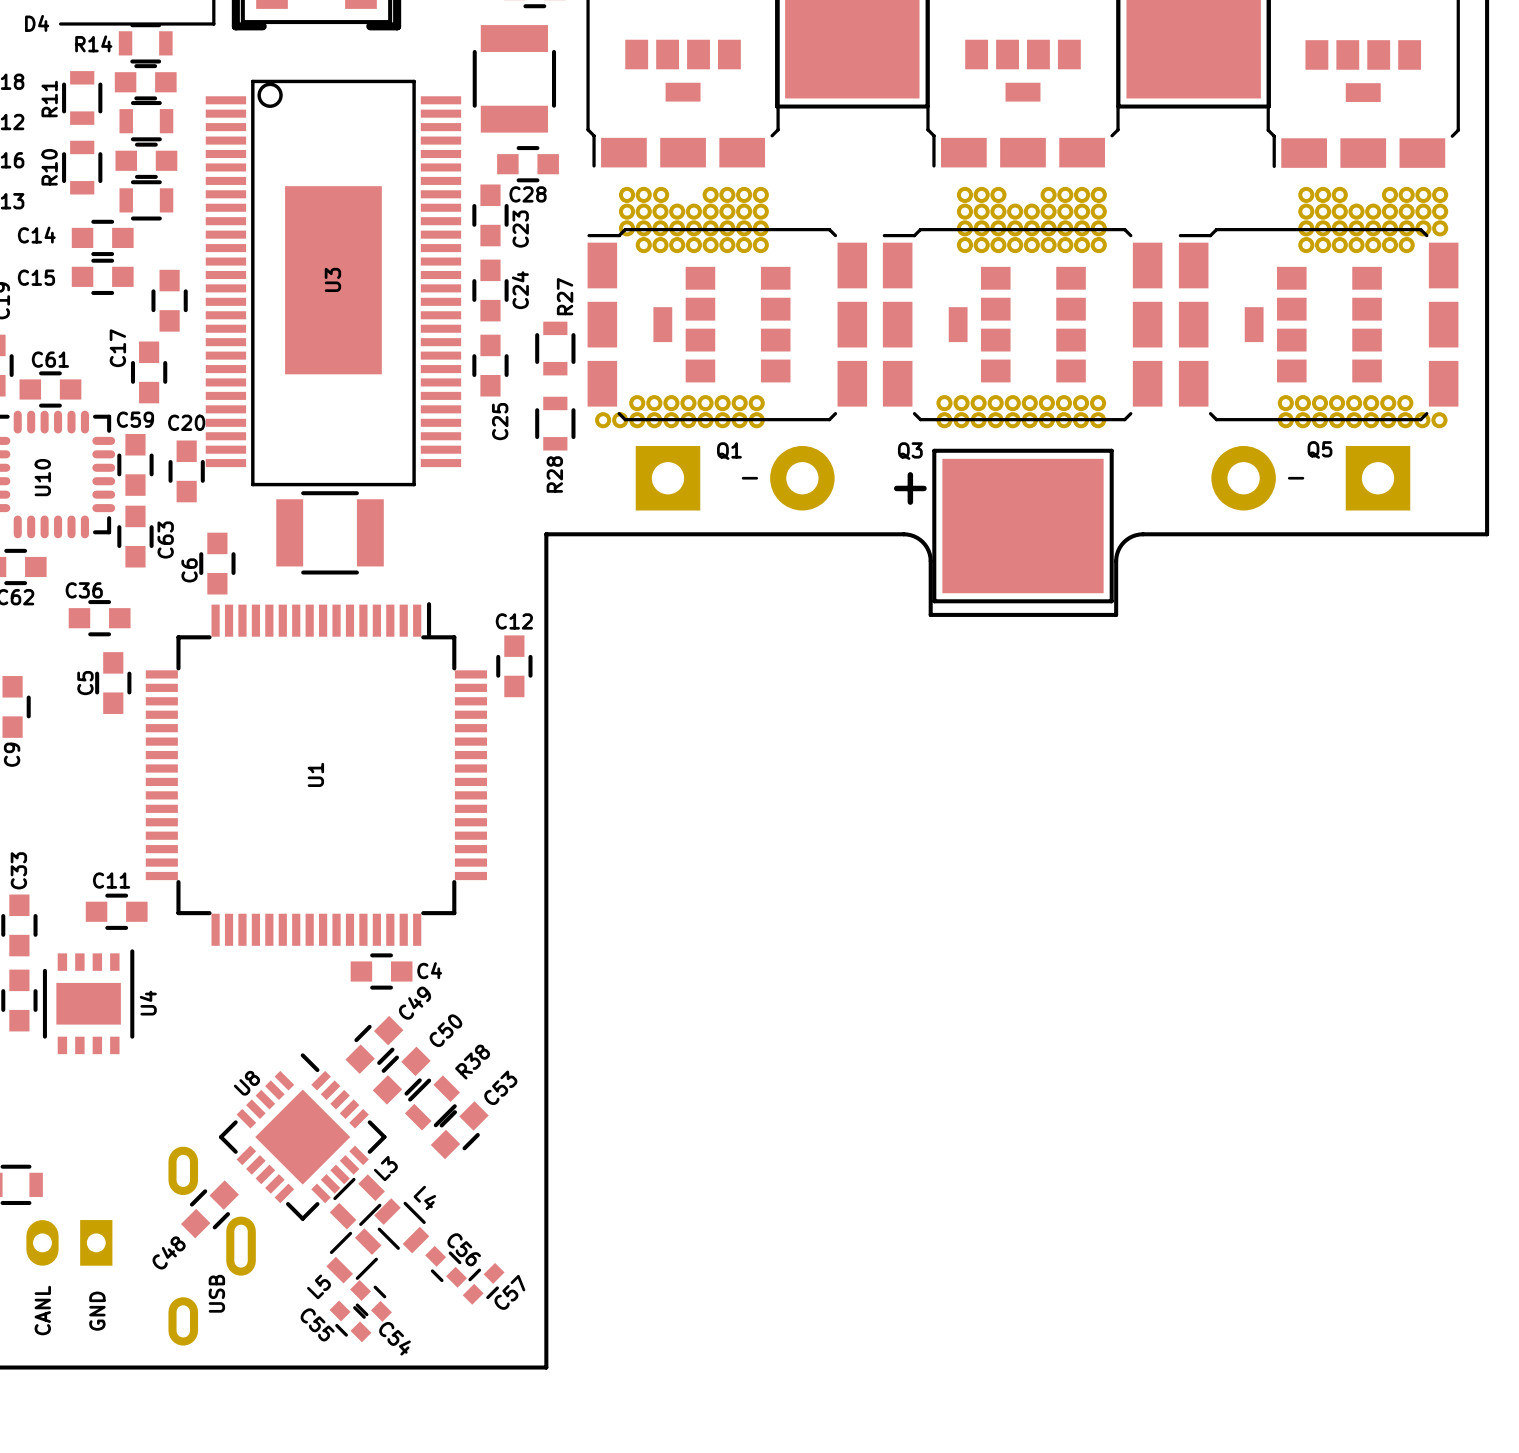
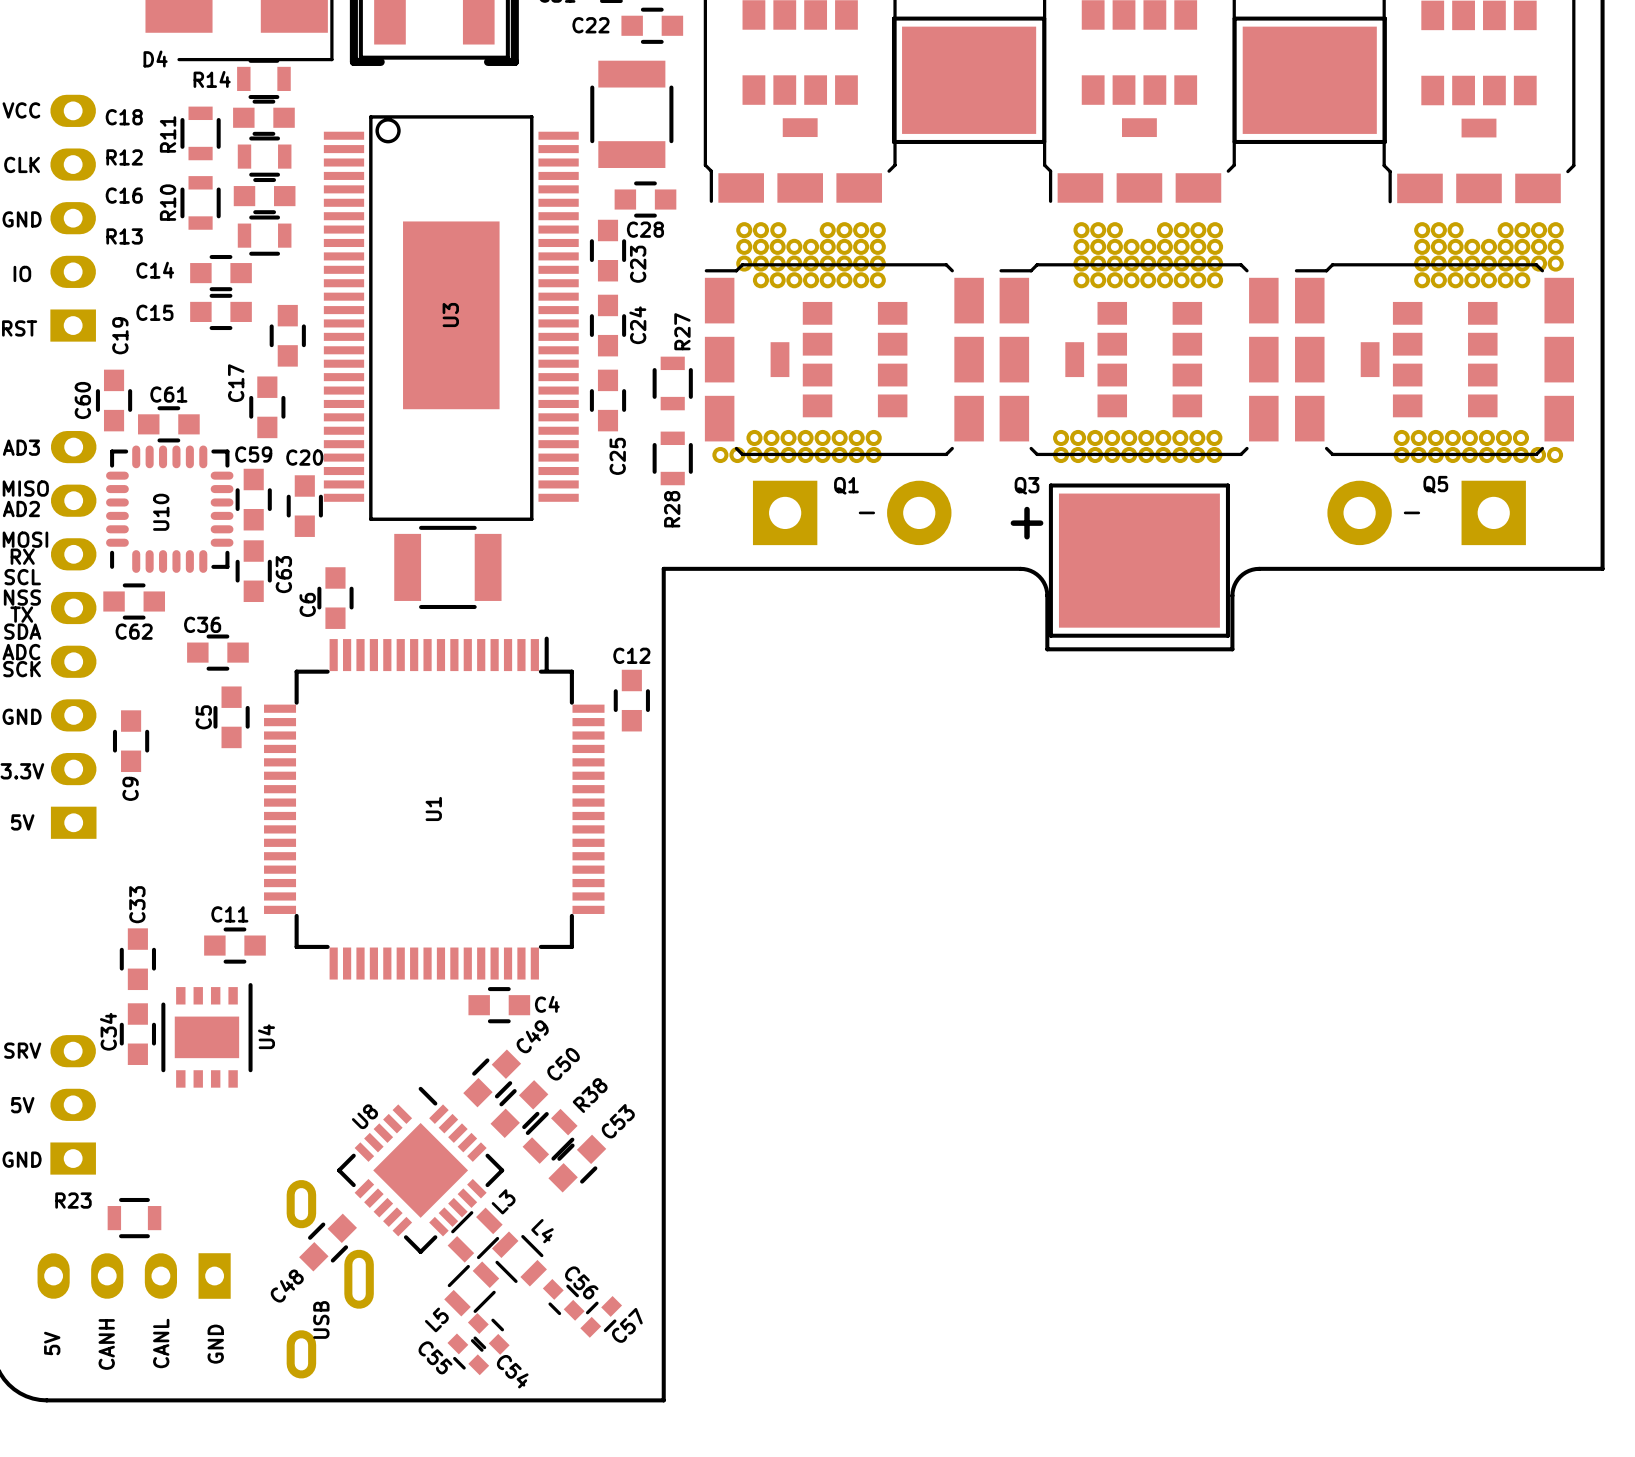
text position: USB (216, 1293) -> USB (321, 1319)

